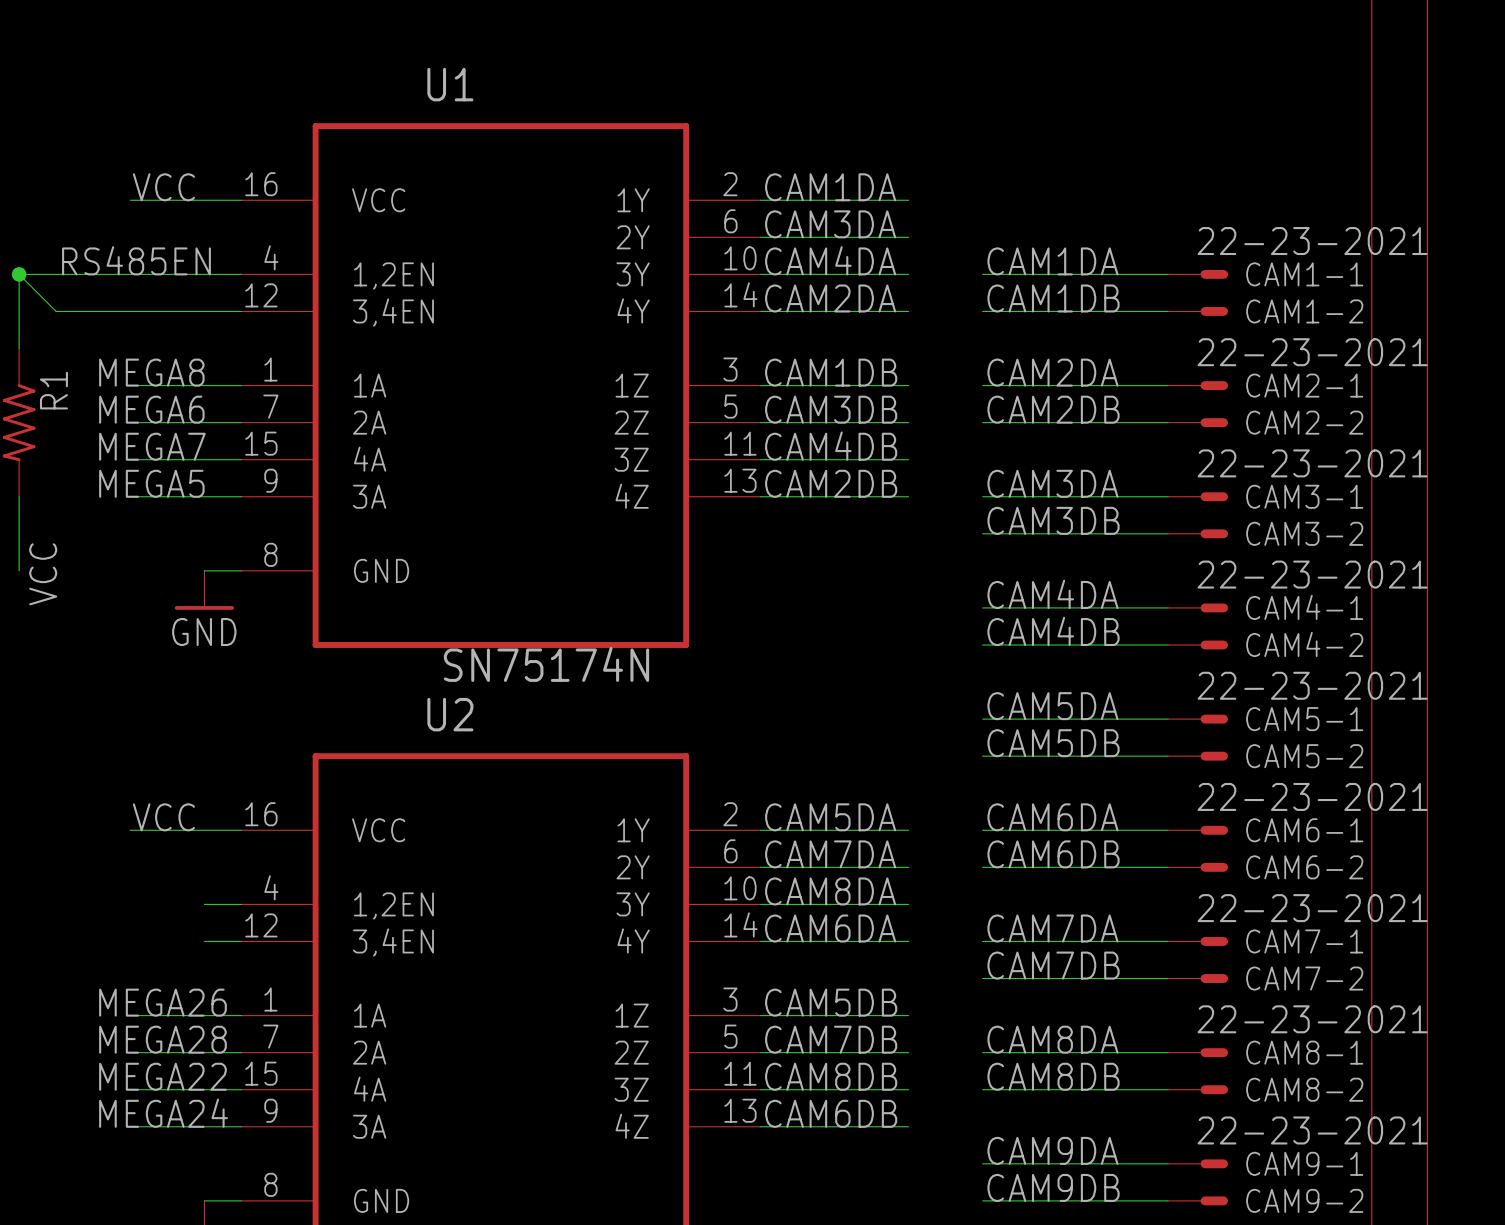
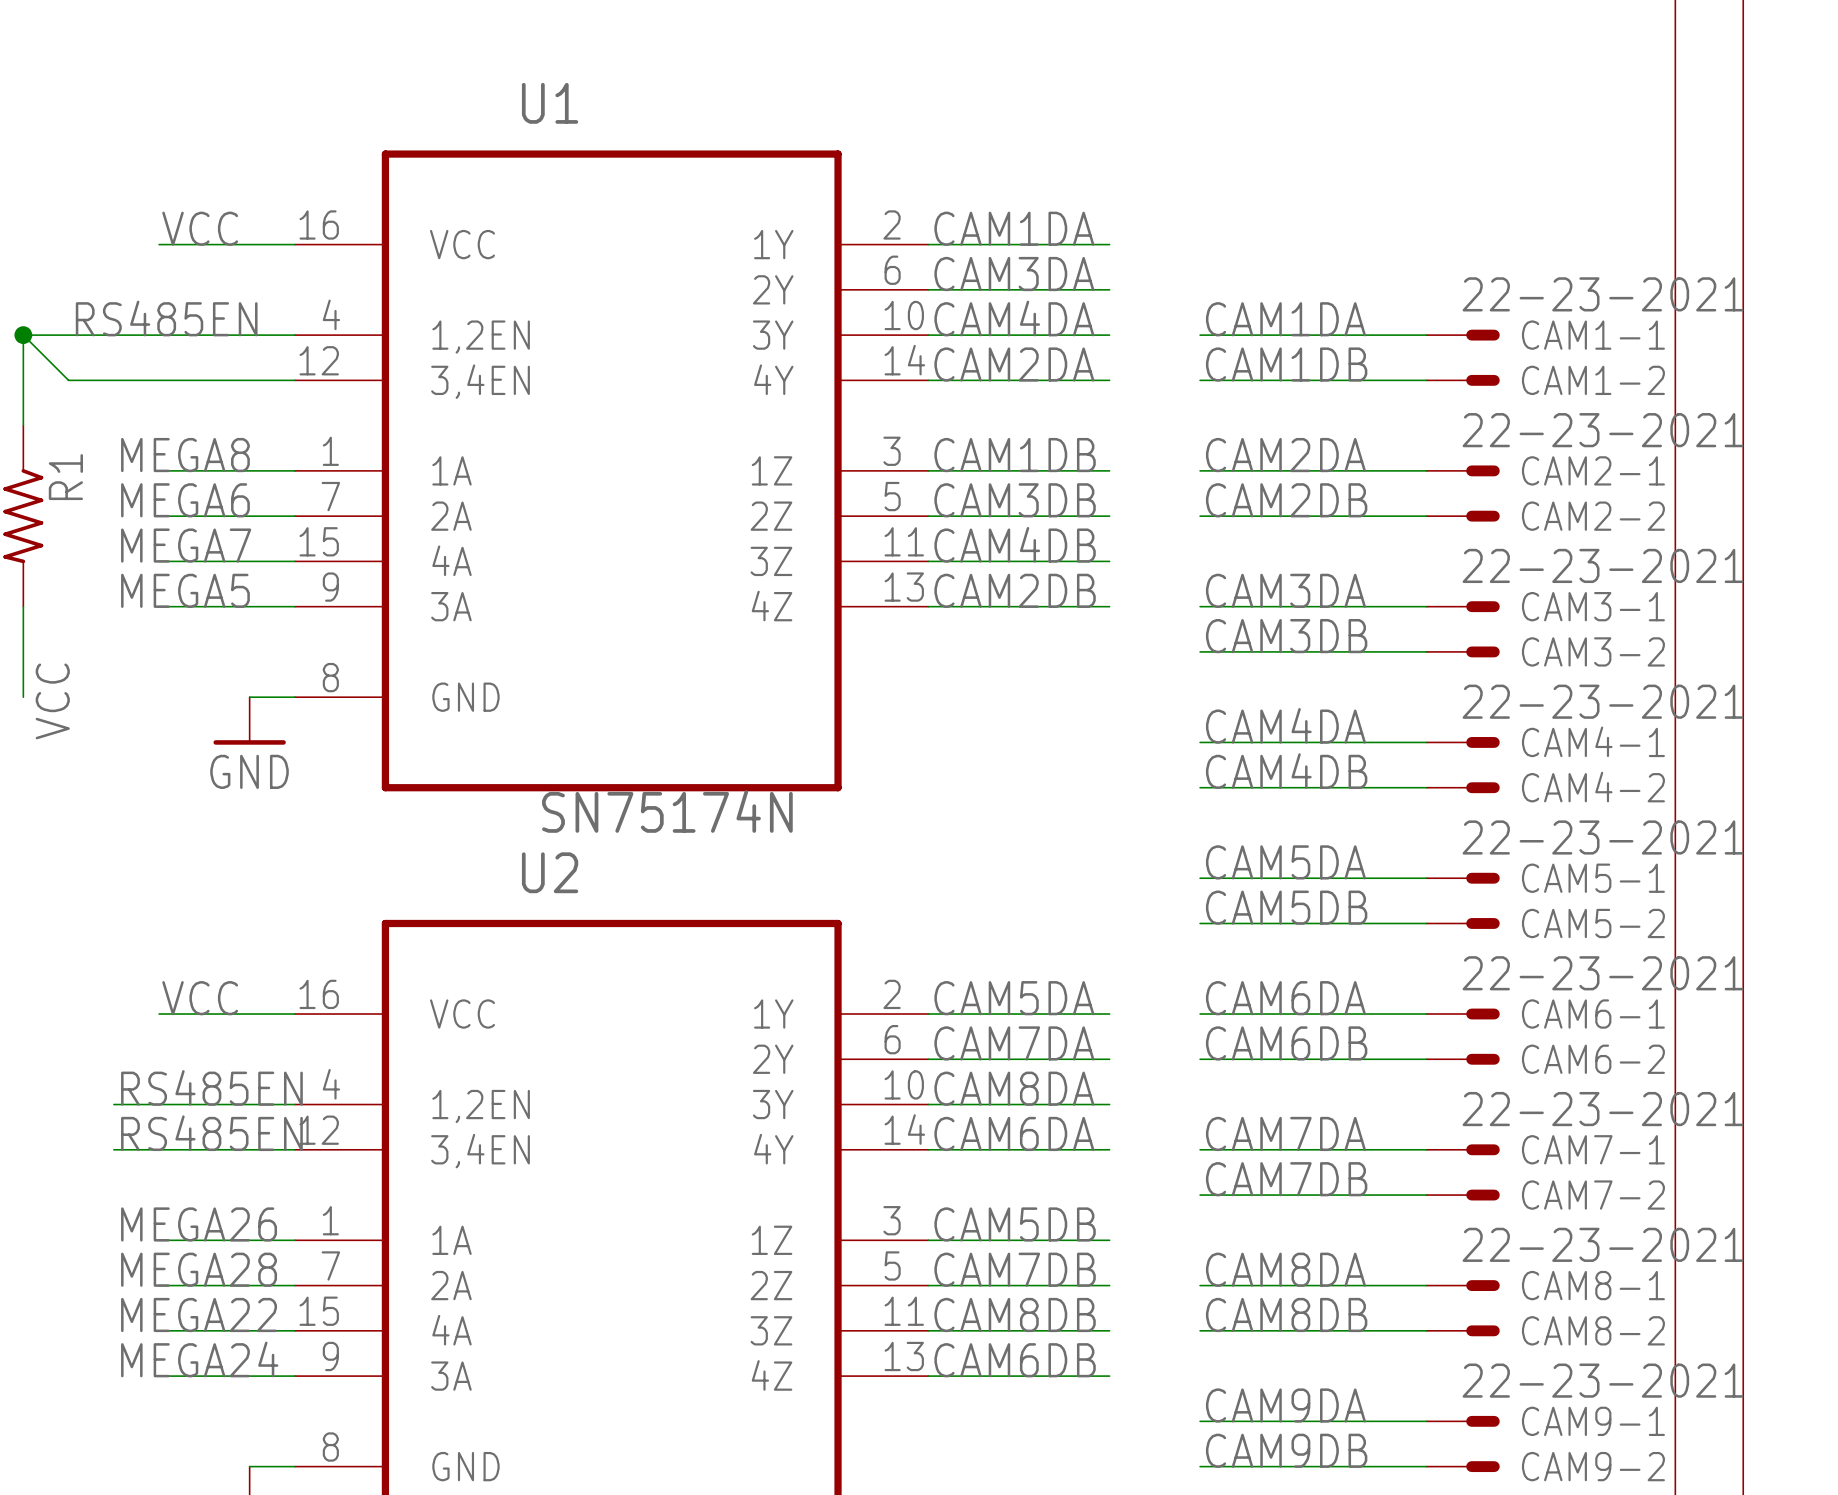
label: none -> RS485EN (211, 1087)
wire: none -> (113, 1104) (249, 1104)
label: none -> RS485EN (211, 1133)
wire: none -> (113, 1149) (249, 1149)

